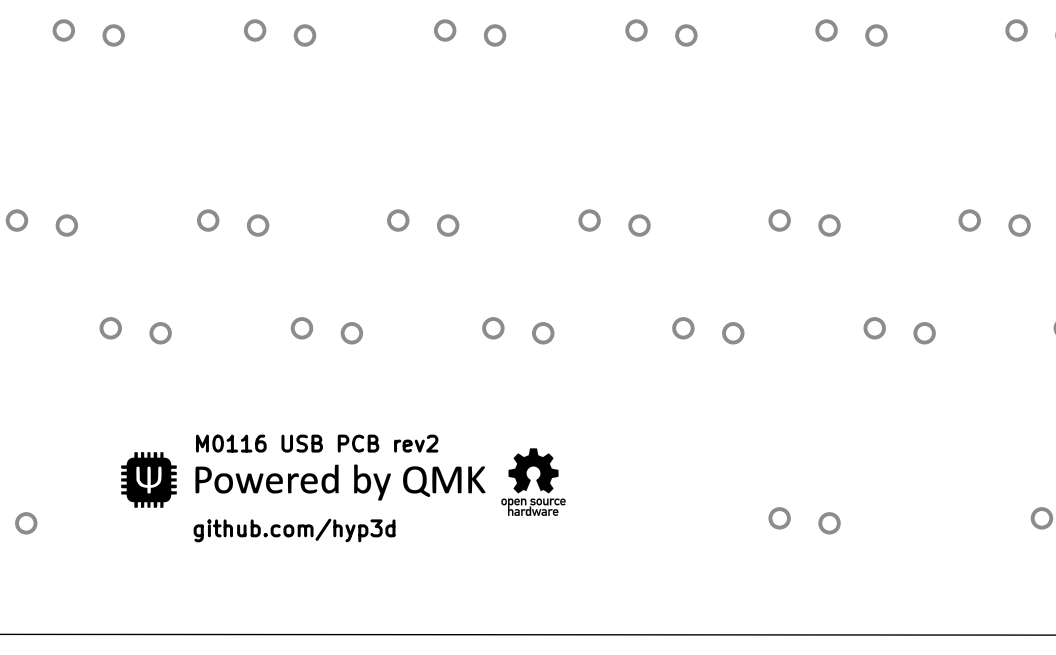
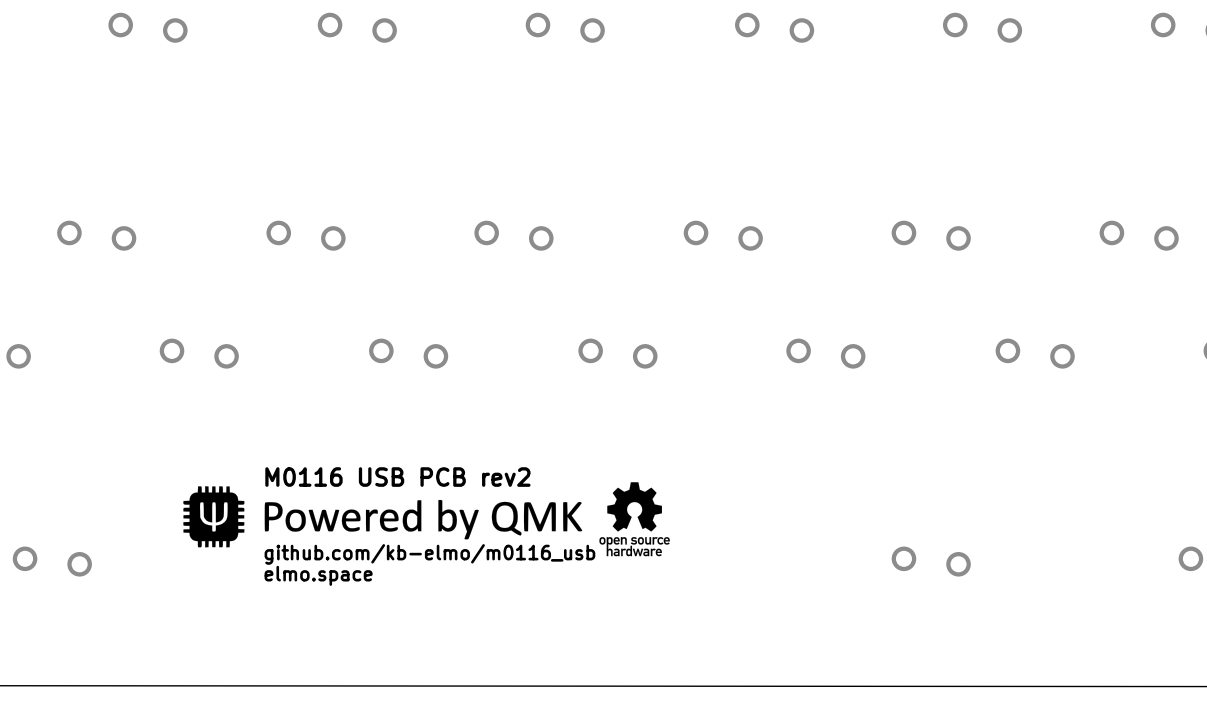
text: none -> github.com/kb-elmo/m0116_usb (429, 554)
text: github.com/hyp3d (294, 530) -> none
text: none -> elmo.space (318, 575)

